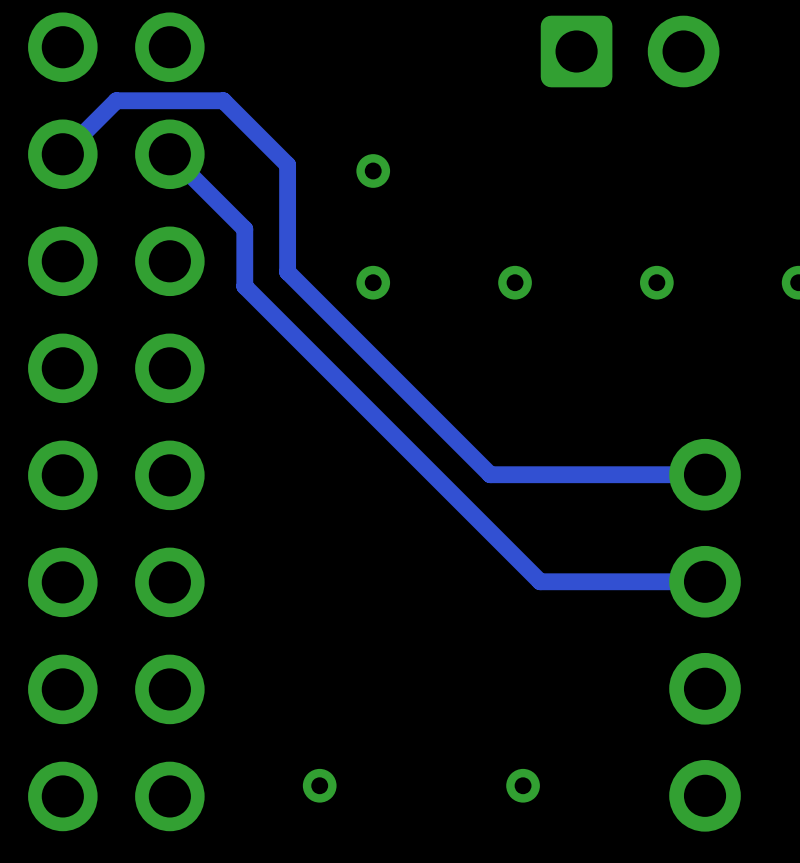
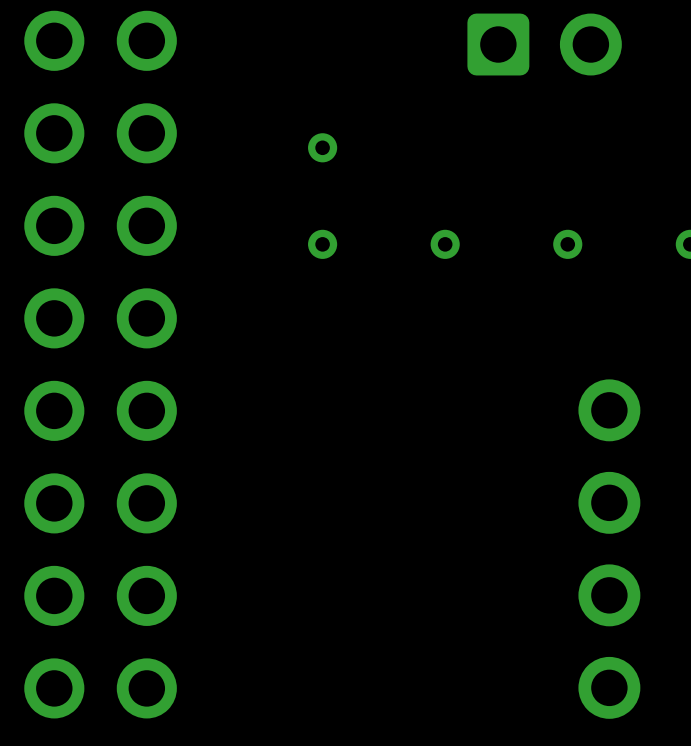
track: (62, 154) (116, 100) (223, 100) (287, 164) (287, 272) (490, 474) (705, 474) -> none
track: (169, 154) (244, 229) (244, 286) (540, 581) (705, 581) -> none
via: (319, 785) -> none
via: (523, 785) -> none

